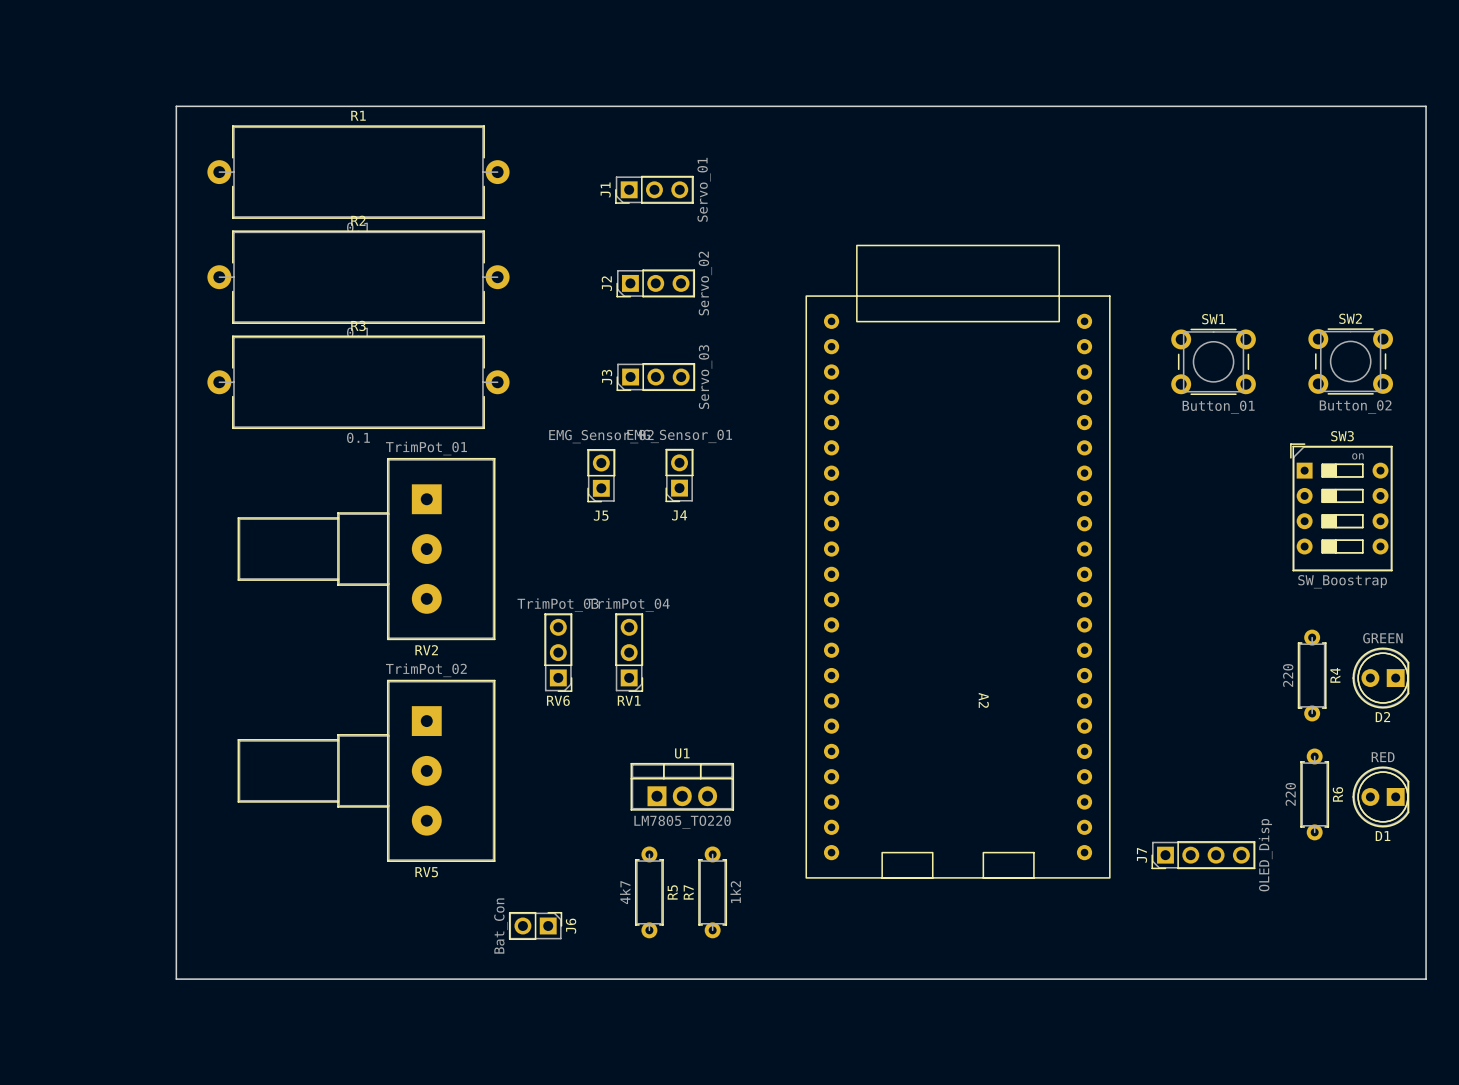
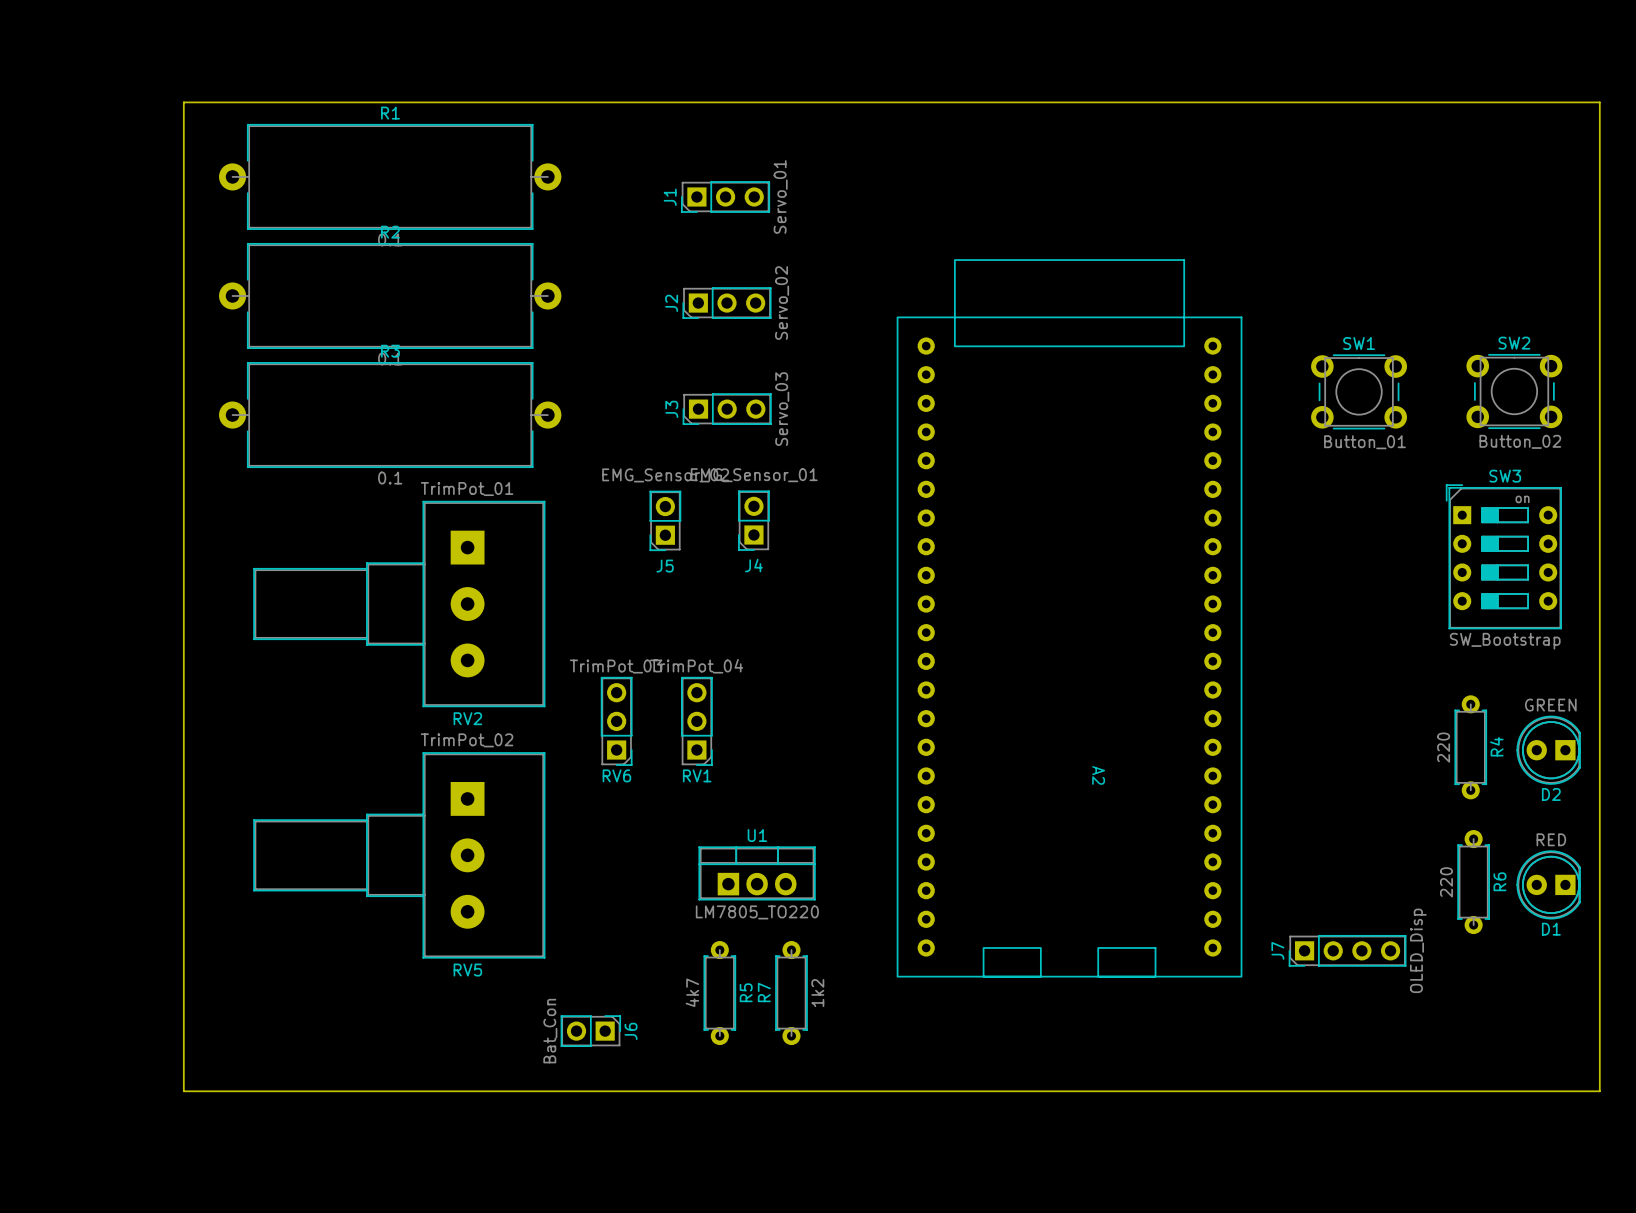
SW3 value: SW_Boostrap (1342, 581) -> SW_Bootstrap (1505, 641)

